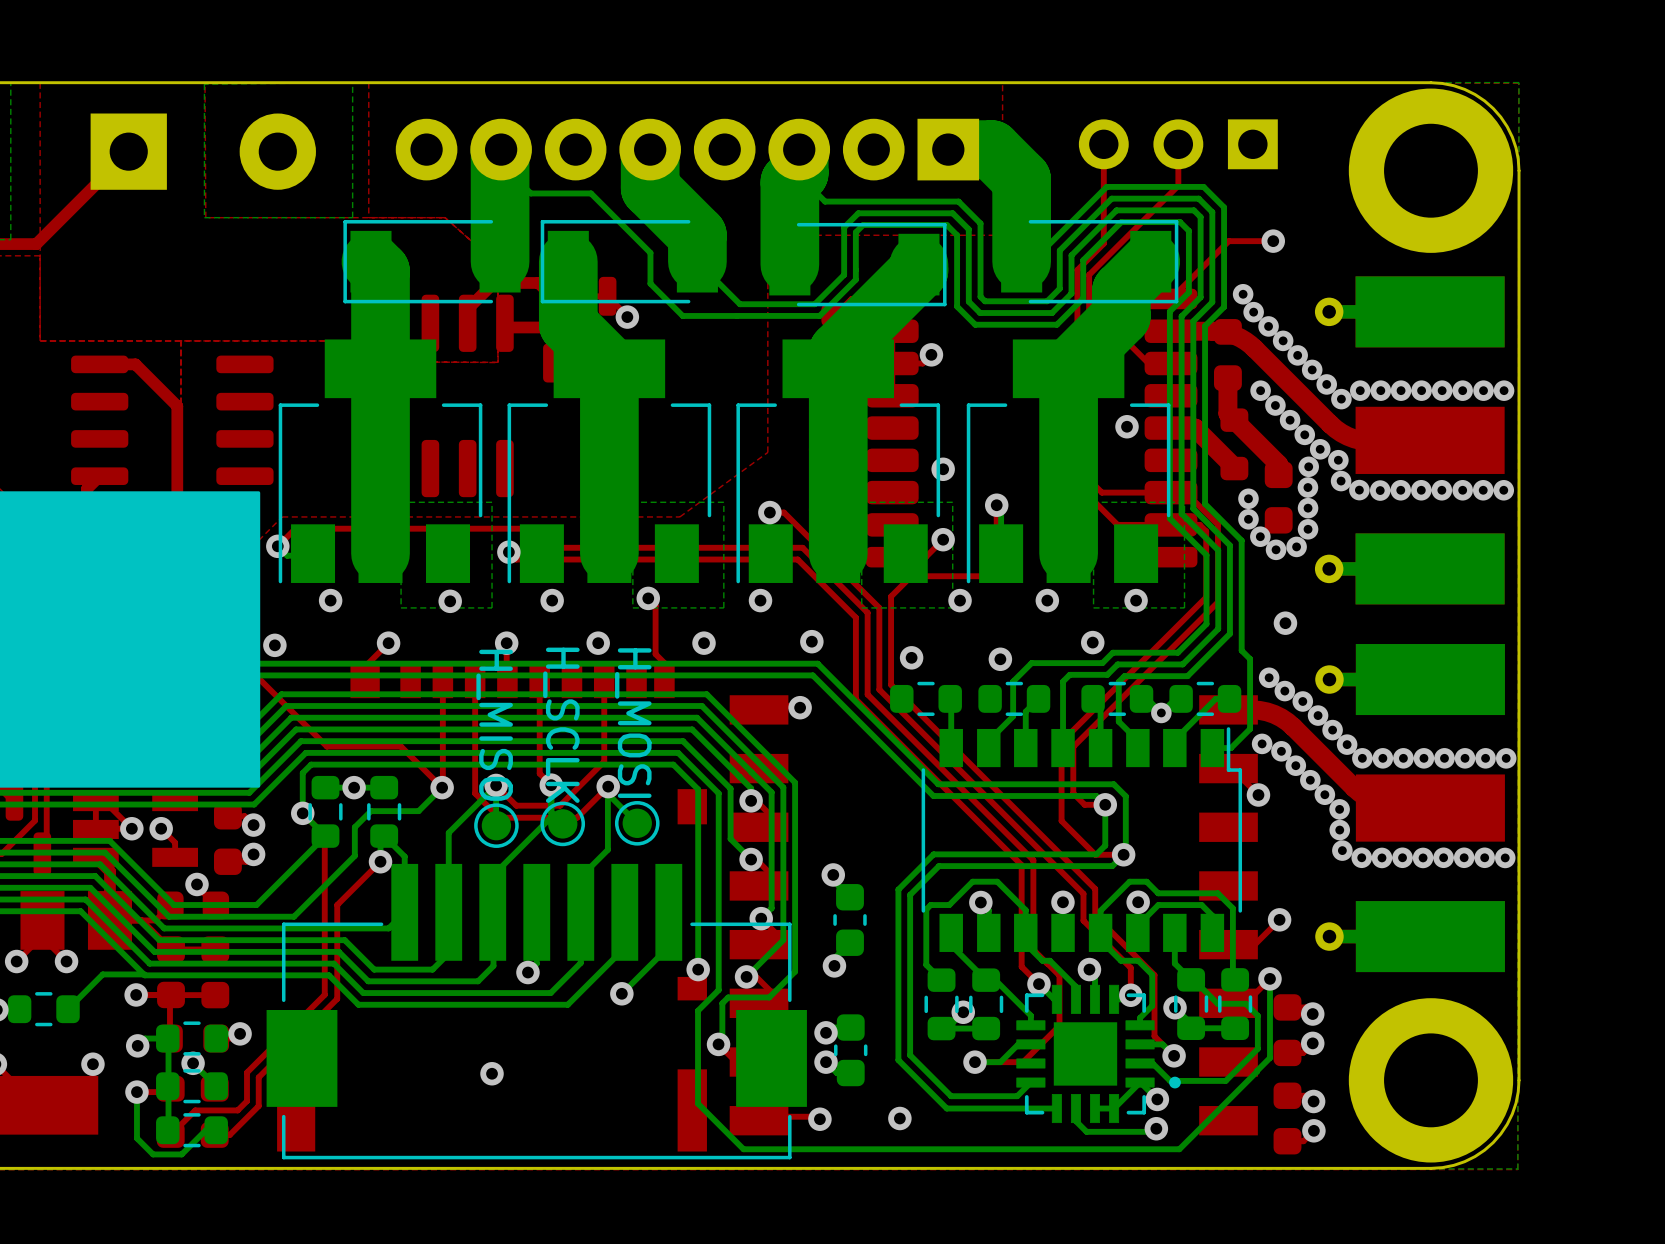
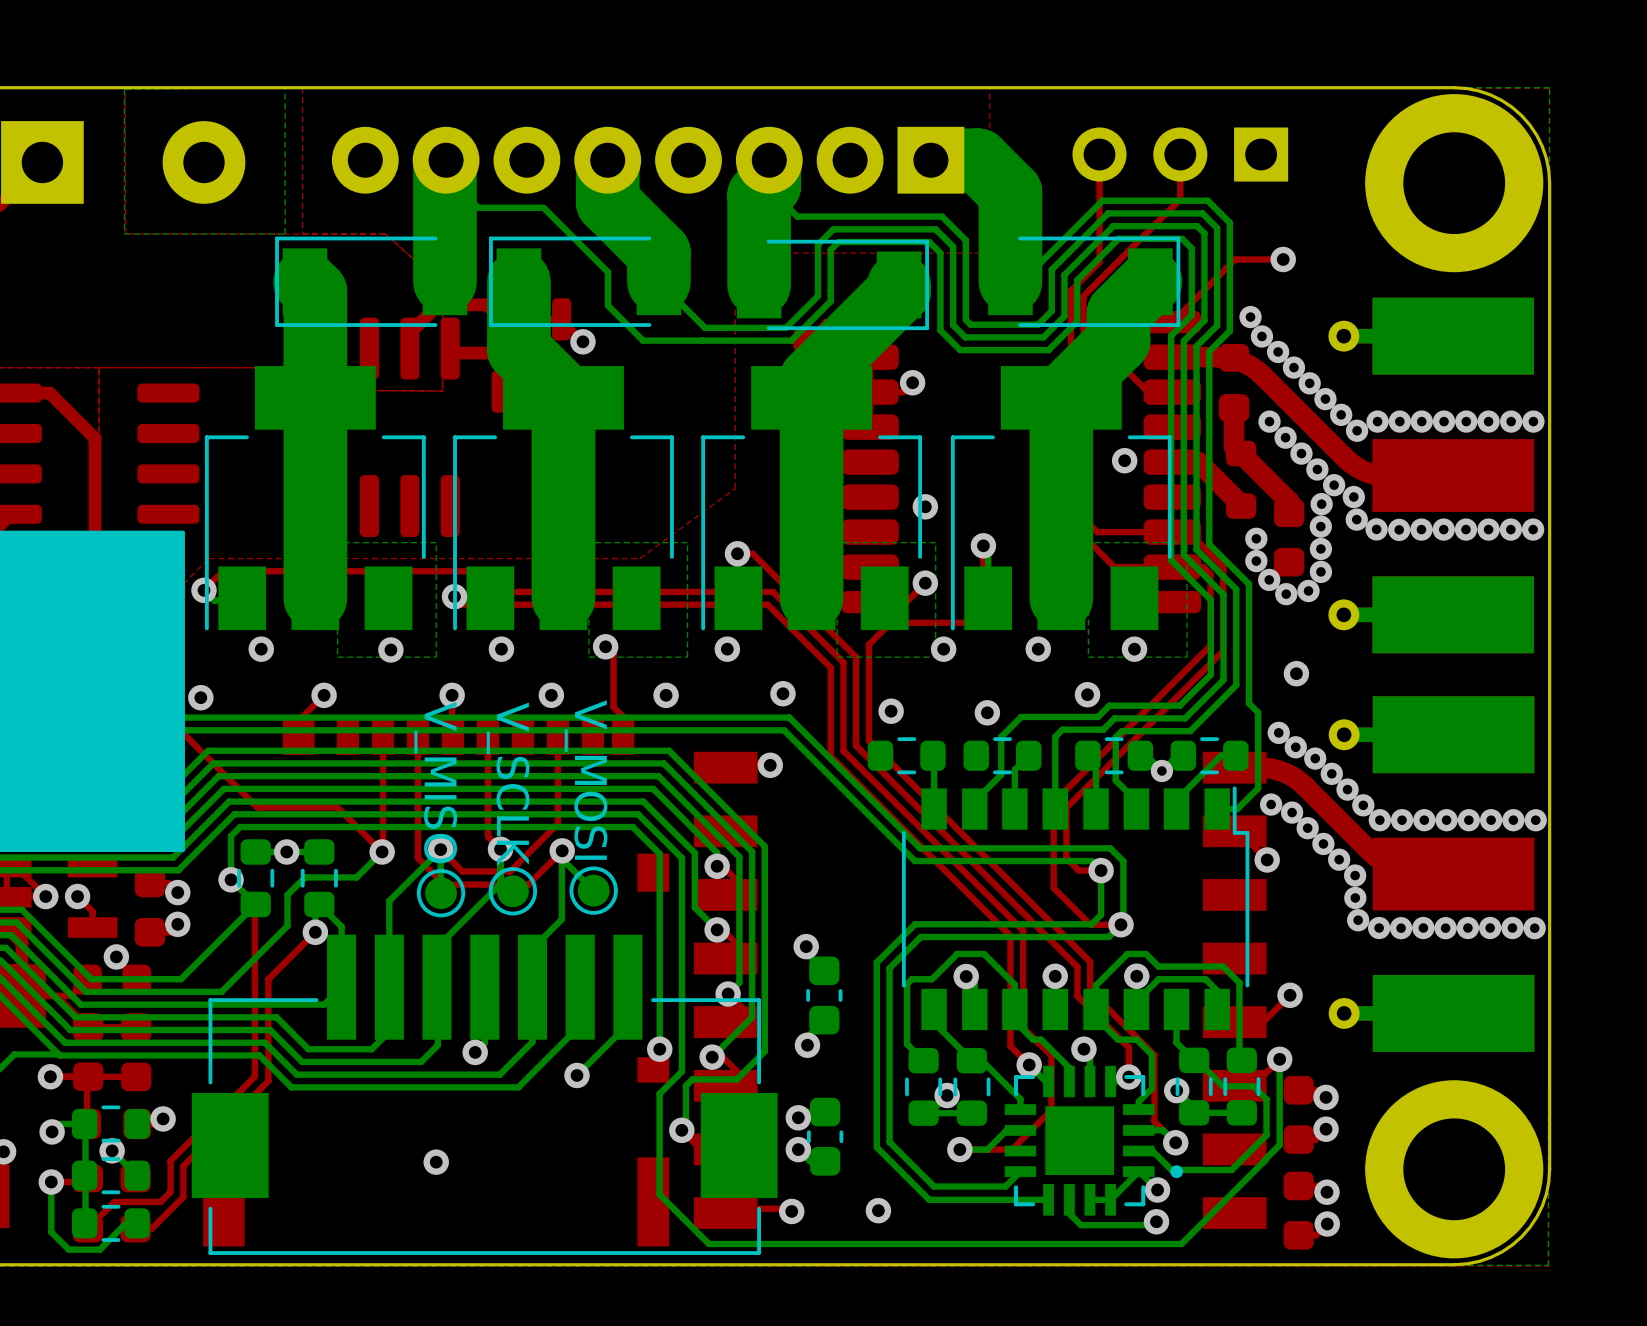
text: H_MOSI (633, 723) -> V_MOSI (586, 780)
text: H_MISO (494, 725) -> V_MISO (435, 782)
text: H_SCLK (561, 725) -> V_SCLK (508, 784)

